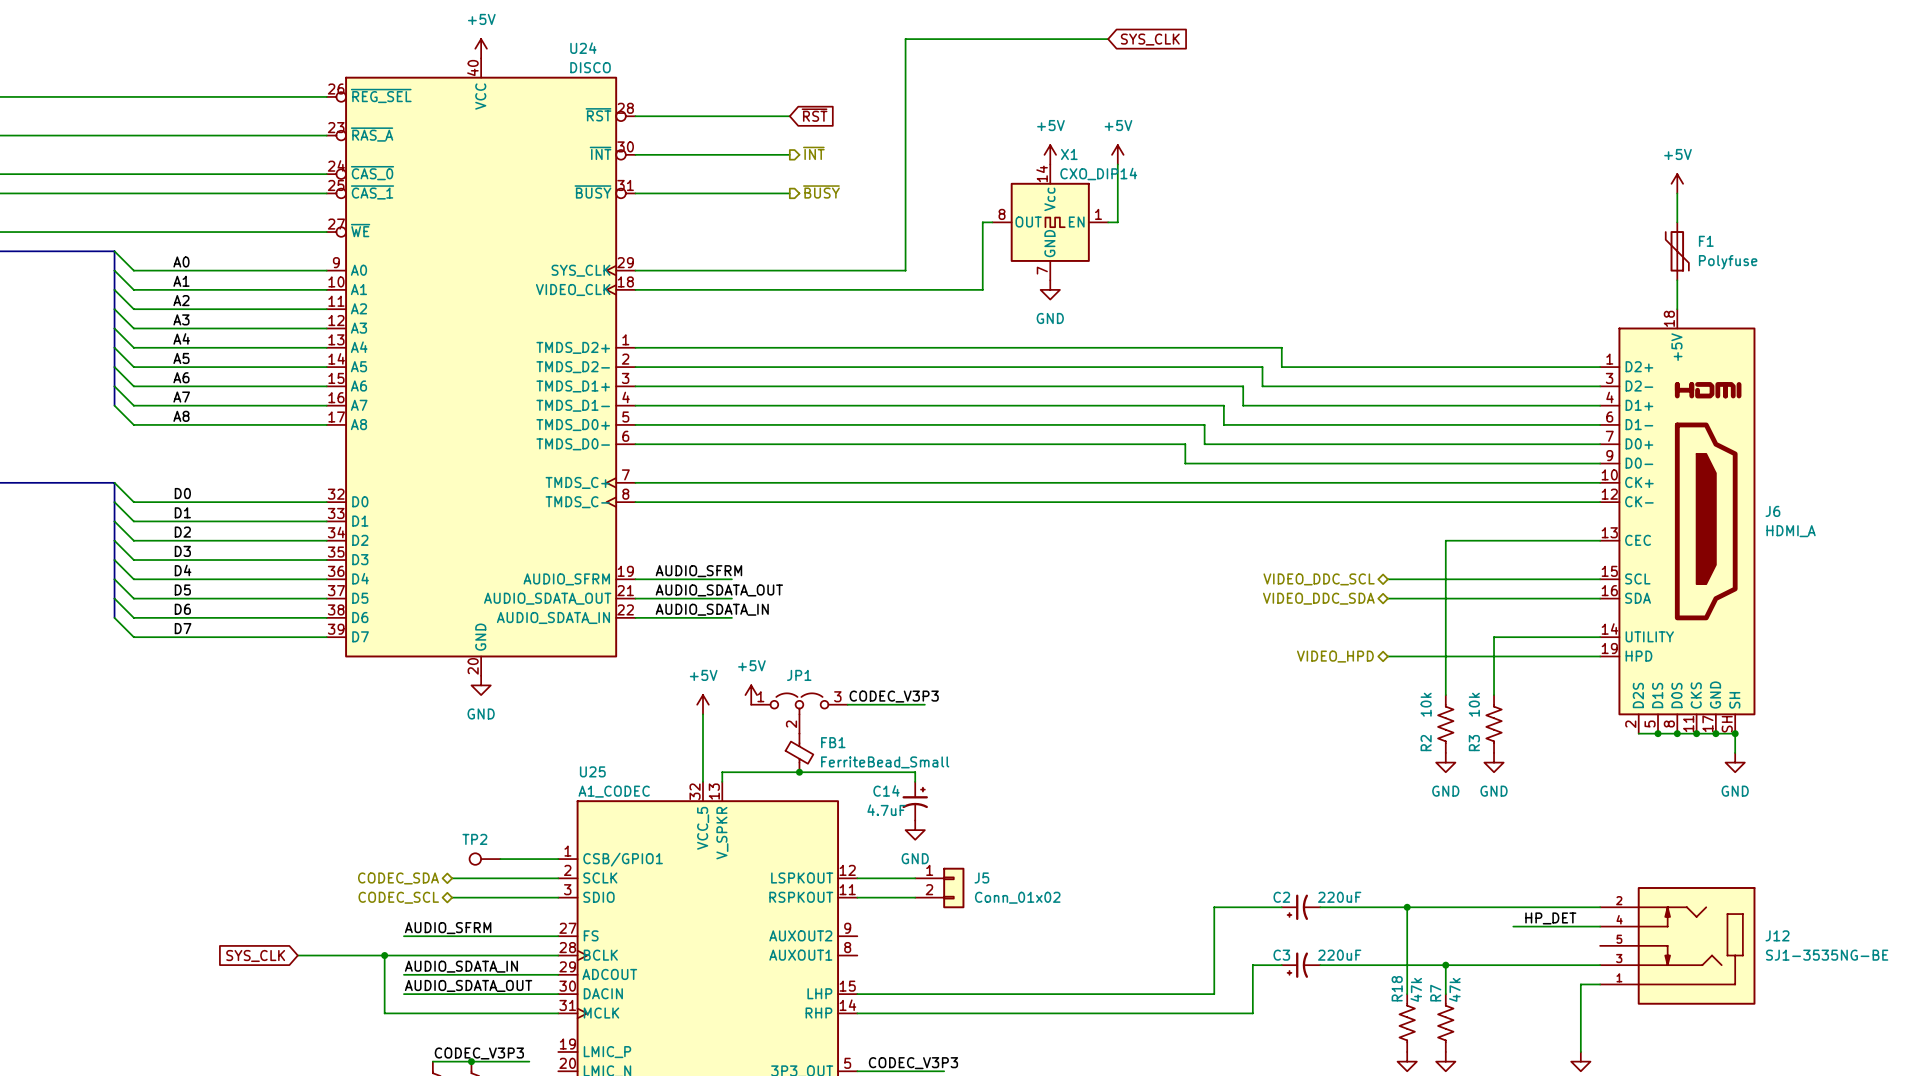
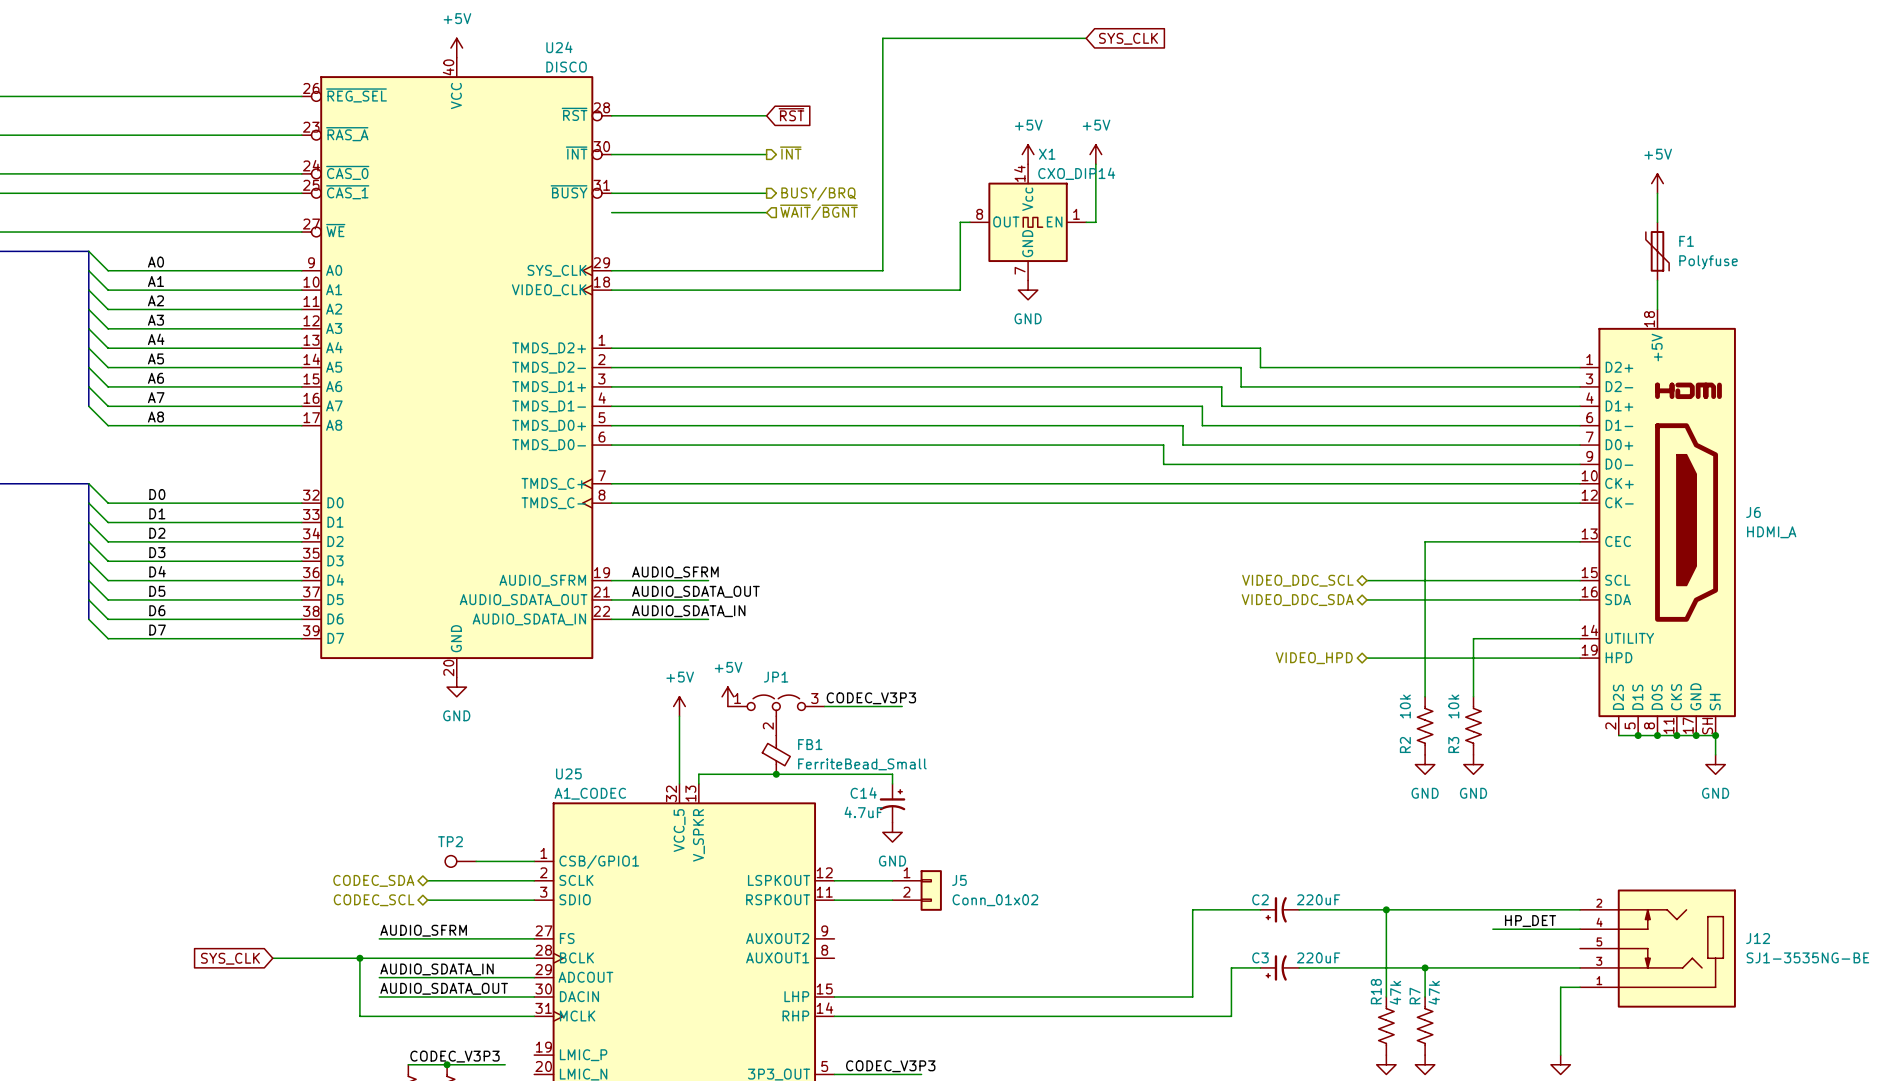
hierarchical label: ~{BUSY} (821, 191) -> BUSY/BRQ (818, 193)
wire: none -> (611, 212) (766, 212)
hierarchical label: none -> ~{WAIT}/~{BGNT} (818, 212)

